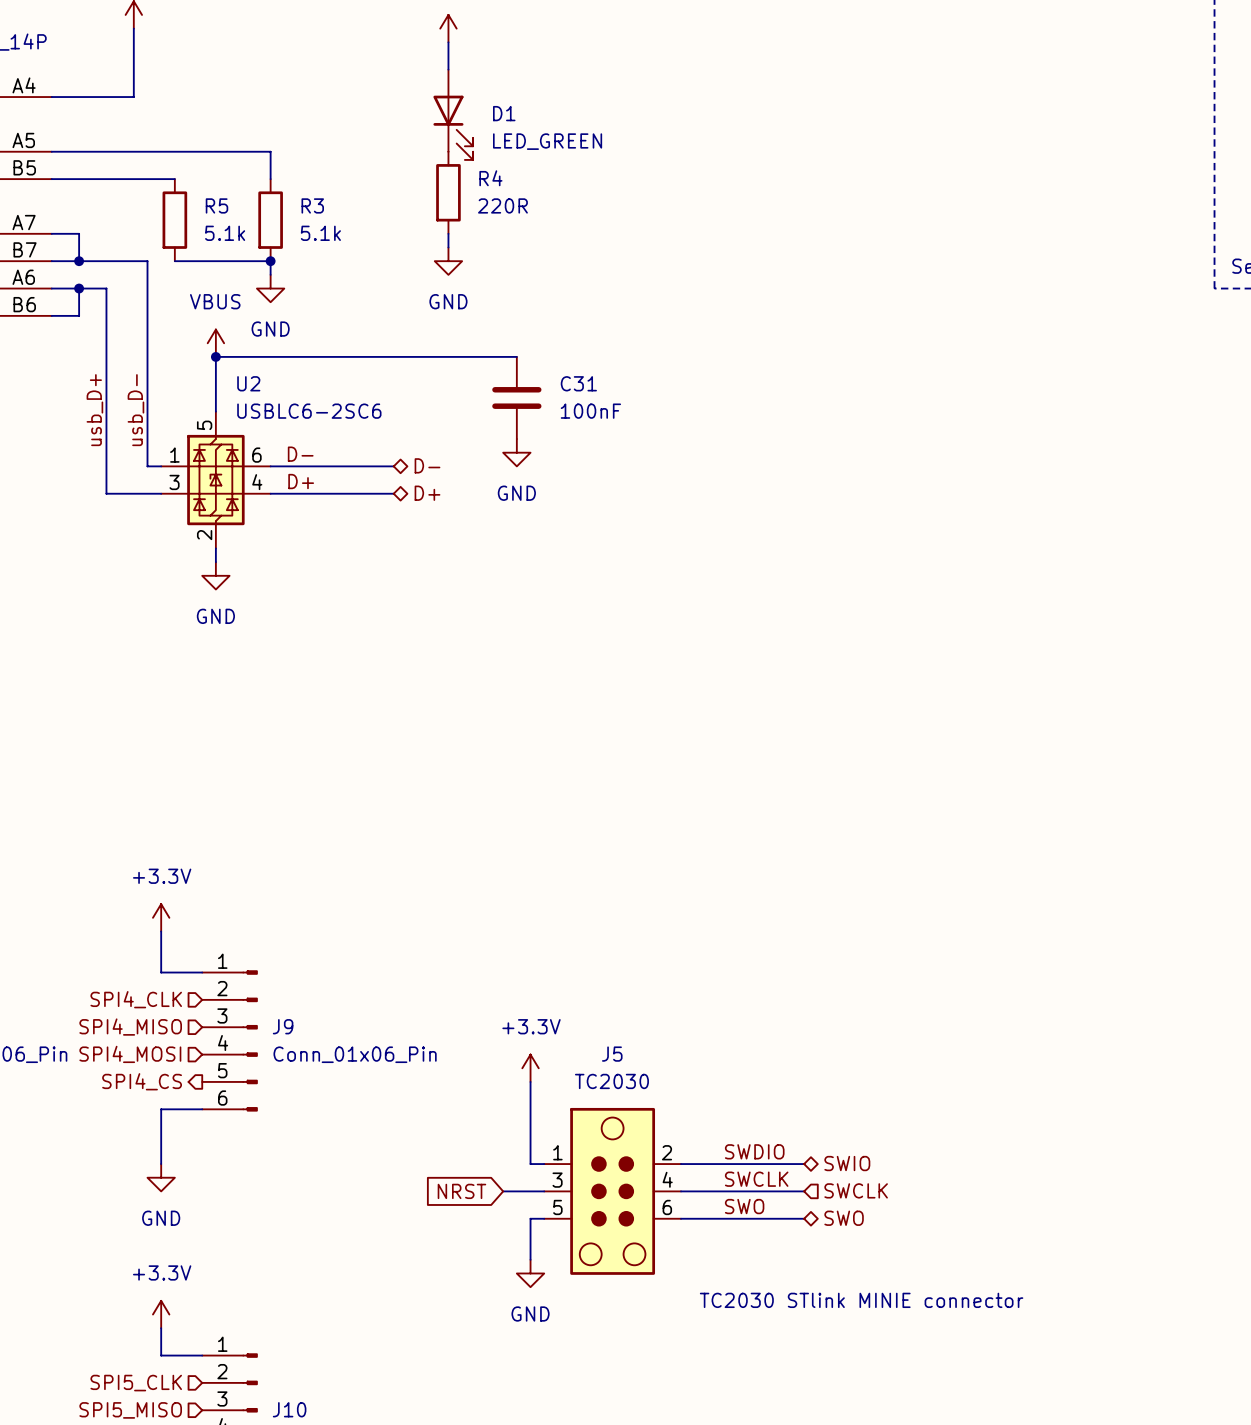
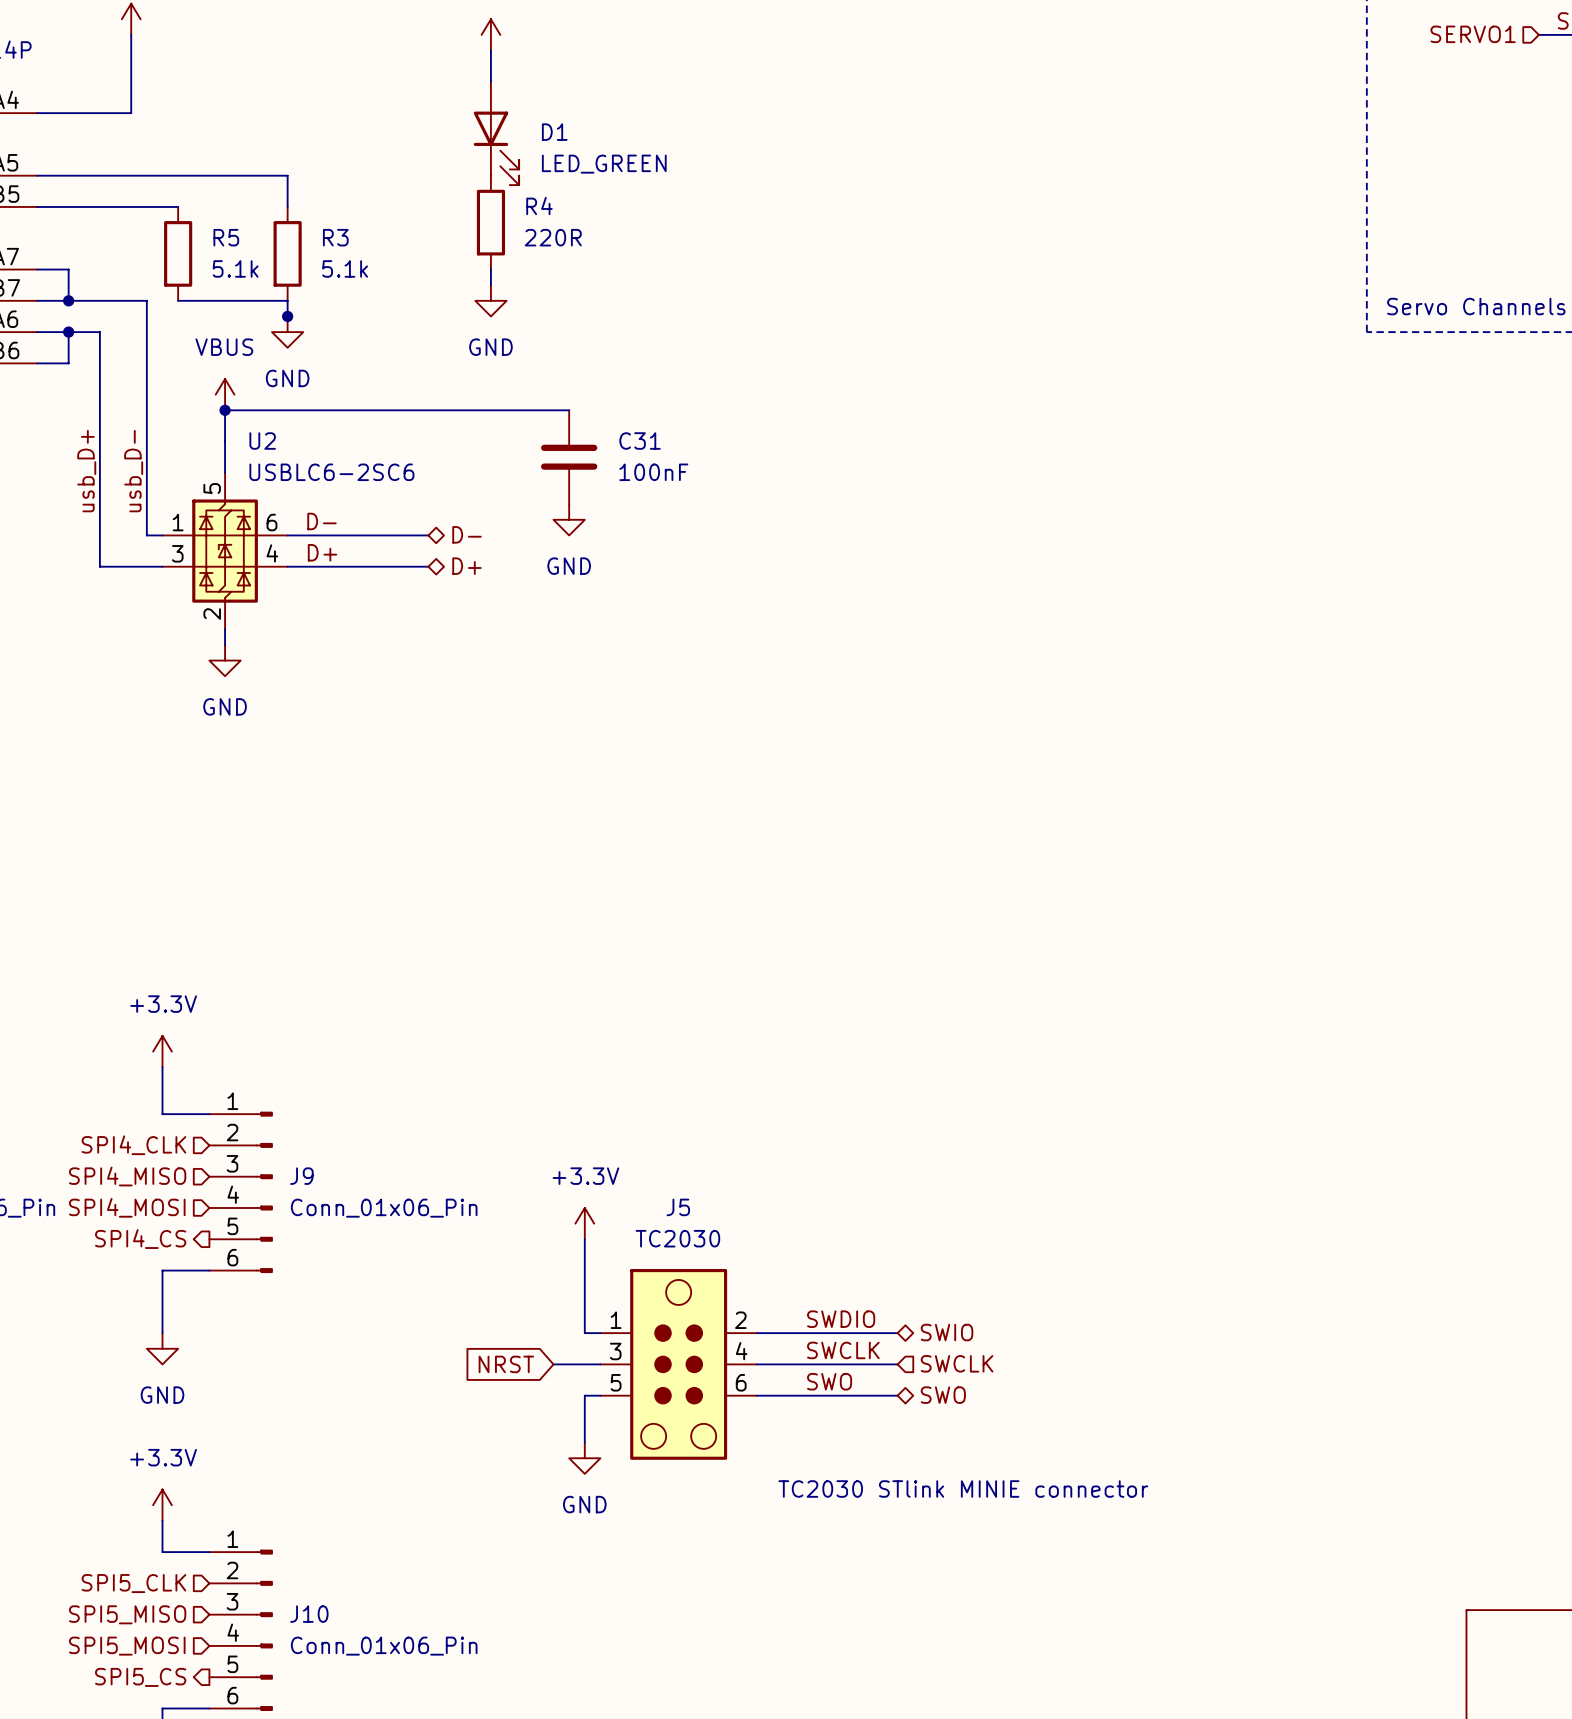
junction position: (270, 261) -> (287, 316)

